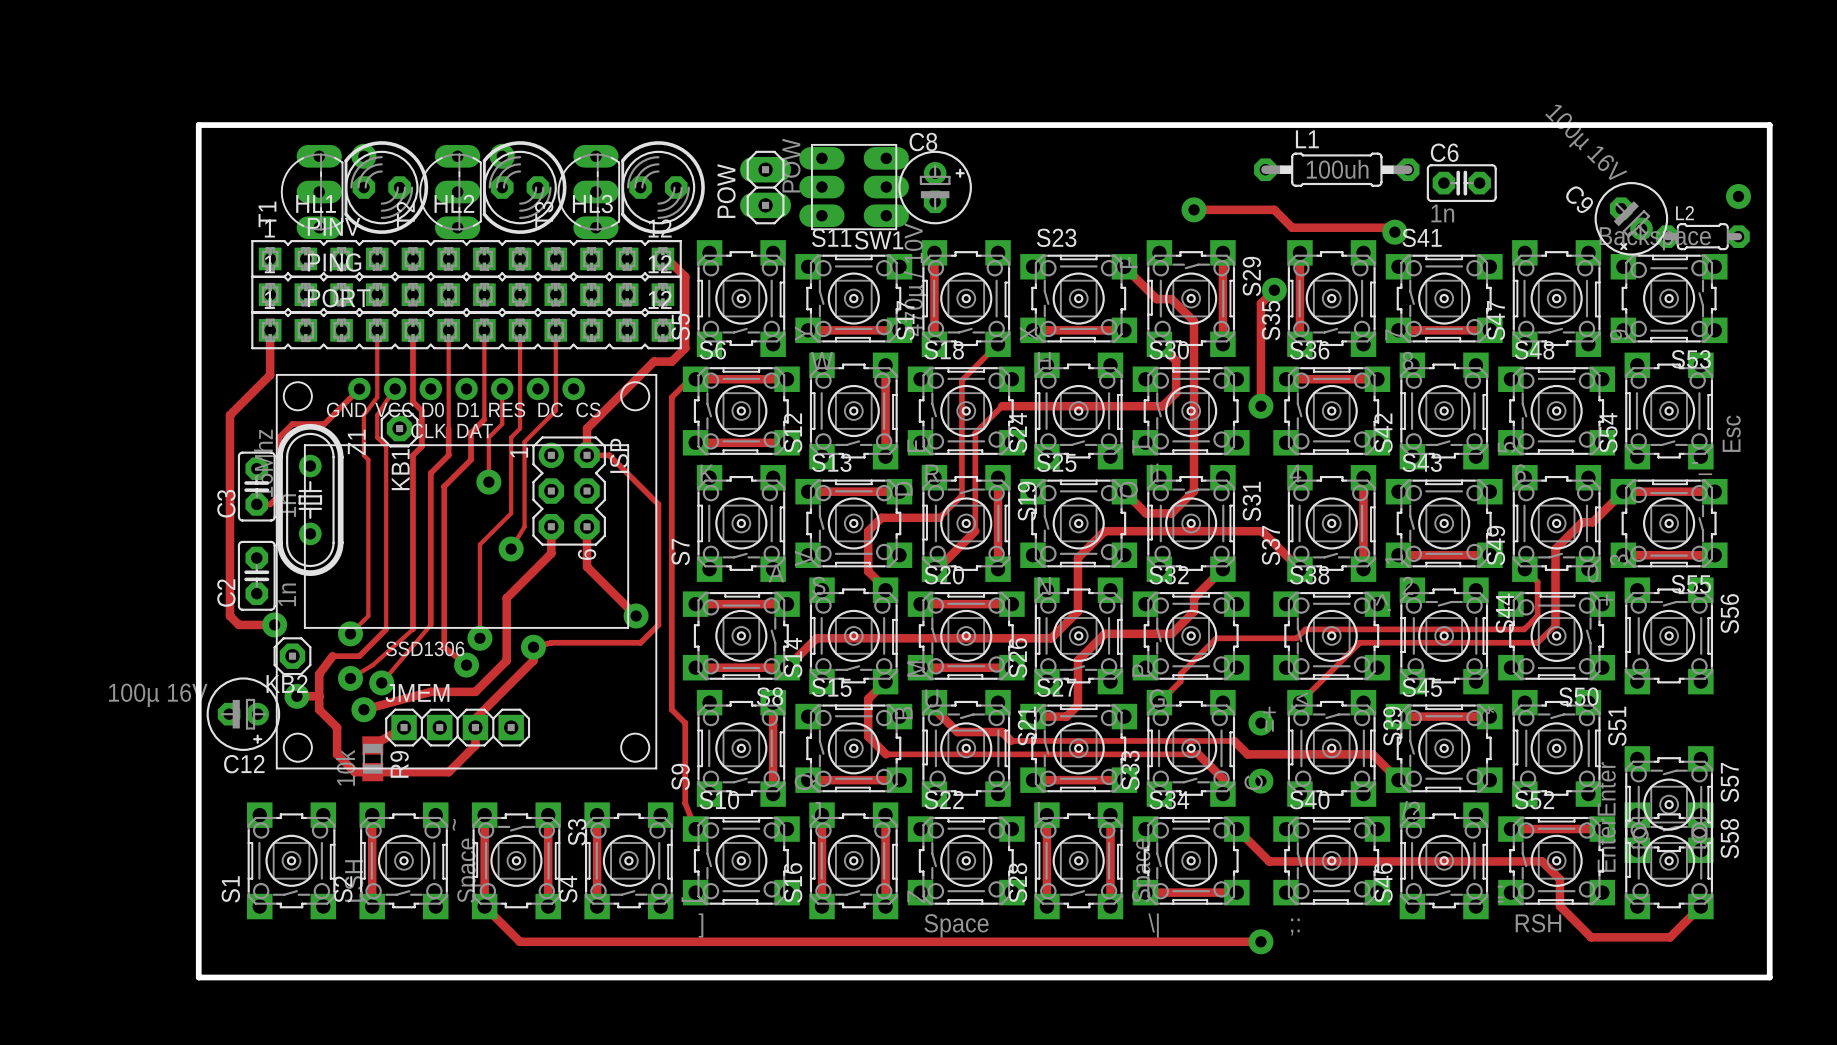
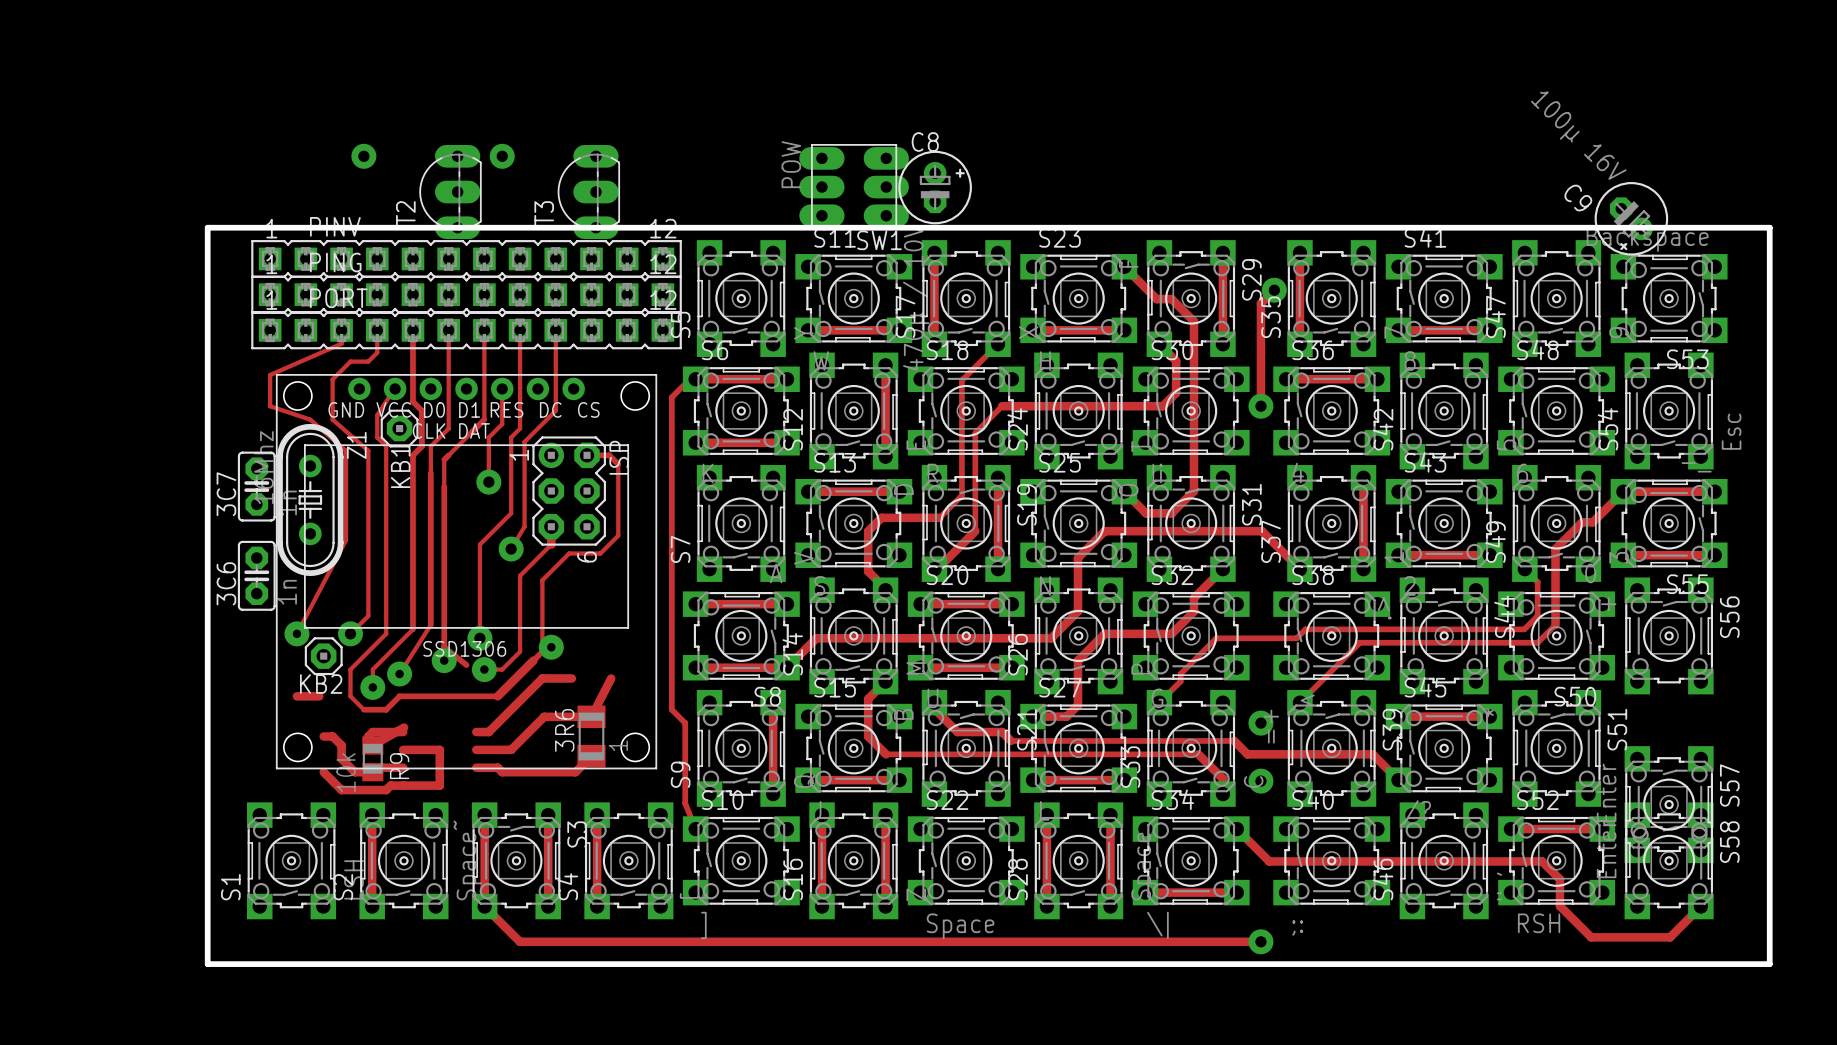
L1: 100uh (1336, 169) -> none
C6: 1n (1461, 183) -> none
HL1: (386, 187) -> none
HL2: (524, 187) -> none
HL3: (662, 187) -> none
POW: (765, 187) -> none
T1: (312, 192) -> none
via: (1738, 196) -> none
track: (1194, 209) (1274, 209) (1292, 227) (1390, 227) (1394, 232) -> none
via: (1194, 209) -> none
board edge: (1769, 227) (1769, 125) (198, 125) (198, 977) (1769, 977) (1769, 964) -> (1769, 227) (207, 227) (207, 964) (1769, 964)
via: (1394, 232) -> none
L2: (1702, 236) -> none
track: (662, 258) (667, 258) (685, 276) (685, 348) (671, 361) (653, 361) (587, 428) (587, 455) -> none
track: (270, 330) (270, 374) (230, 415) (230, 616) (238, 624) (274, 624) -> none
track: none -> (341, 330) (341, 343) (270, 374) (270, 406) (310, 419) (346, 450) (346, 540) (296, 633)
track: (377, 352) (377, 397) (363, 415) (363, 455) (368, 459) -> (377, 352) (368, 361) (350, 361) (332, 379) (332, 419) (368, 450) (368, 459)
part footprint: [275, 374, 658, 770] -> [275, 374, 658, 770]
track: (359, 388) (324, 424) (292, 424) (279, 437) (279, 495) (270, 504) (256, 504) -> none
track: (448, 428) (448, 455) -> (471, 433) (448, 455)
track: none -> (448, 428) (430, 446) (430, 473)
track: (471, 433) (471, 459) (444, 486) -> none
track: (444, 459) (430, 473) -> (444, 459) (444, 486)
track: (618, 464) (658, 504) (658, 624) (640, 642) (551, 642) (533, 647) (533, 660) -> (618, 464) (618, 535) (600, 553) (569, 553) (542, 580) (542, 651) (533, 660)
C3 name: C3 (226, 503) -> 3C7 (226, 494)
track: (587, 526) (587, 566) (636, 616) -> none
track: (551, 544) (551, 553) (506, 598) (506, 660) (475, 691) (430, 691) (363, 709) -> (551, 544) (520, 575) (520, 651) (502, 669) (484, 669)
C2 name: C2 (226, 593) -> 3C6 (226, 583)
via: (636, 616) -> none
via: (274, 624) -> none
track: (430, 624) (381, 682) -> (430, 624) (399, 674)
track: (386, 629) (359, 656) (332, 656) (319, 674) (319, 709) (337, 727) (337, 754) (341, 758) -> (323, 736) (332, 736) (341, 745) (341, 758)
track: none -> (386, 629) (386, 633) (350, 669) (350, 696) (363, 709) (386, 709) (399, 696) (497, 696)
track: (412, 629) (372, 665) (350, 678) -> (412, 629) (372, 669) (372, 687)
via: none -> (296, 633)
via: (533, 647) -> none
via: none -> (551, 647)
KB2 position: (292, 656) -> (323, 656)
via: none -> (444, 660)
via: (466, 665) -> none
via: none -> (484, 669)
via: none -> (399, 674)
via: (350, 678) -> none
track: none -> (571, 678) (542, 678) (488, 732) (476, 732)
track: none -> (611, 678) (591, 716) (544, 716) (511, 749) (476, 749)
via: (381, 682) -> none
via: none -> (372, 687)
via: (296, 696) -> none
track: (497, 696) (475, 718) (475, 745) (448, 772) (354, 772) -> (403, 767) (381, 767) (377, 772) (354, 772)
via: (363, 709) -> none
C12: 100µ 16V (243, 714) -> none
JMEM: (457, 727) -> none
track: none -> (403, 732) (372, 732) (368, 736) (368, 749)
3R6: none -> 1 (591, 736)
track: none -> (403, 749) (439, 749) (439, 785) (390, 785) (386, 790) (341, 790) (323, 772)
track: none -> (591, 756) (575, 772) (502, 772) (497, 767) (476, 767)

